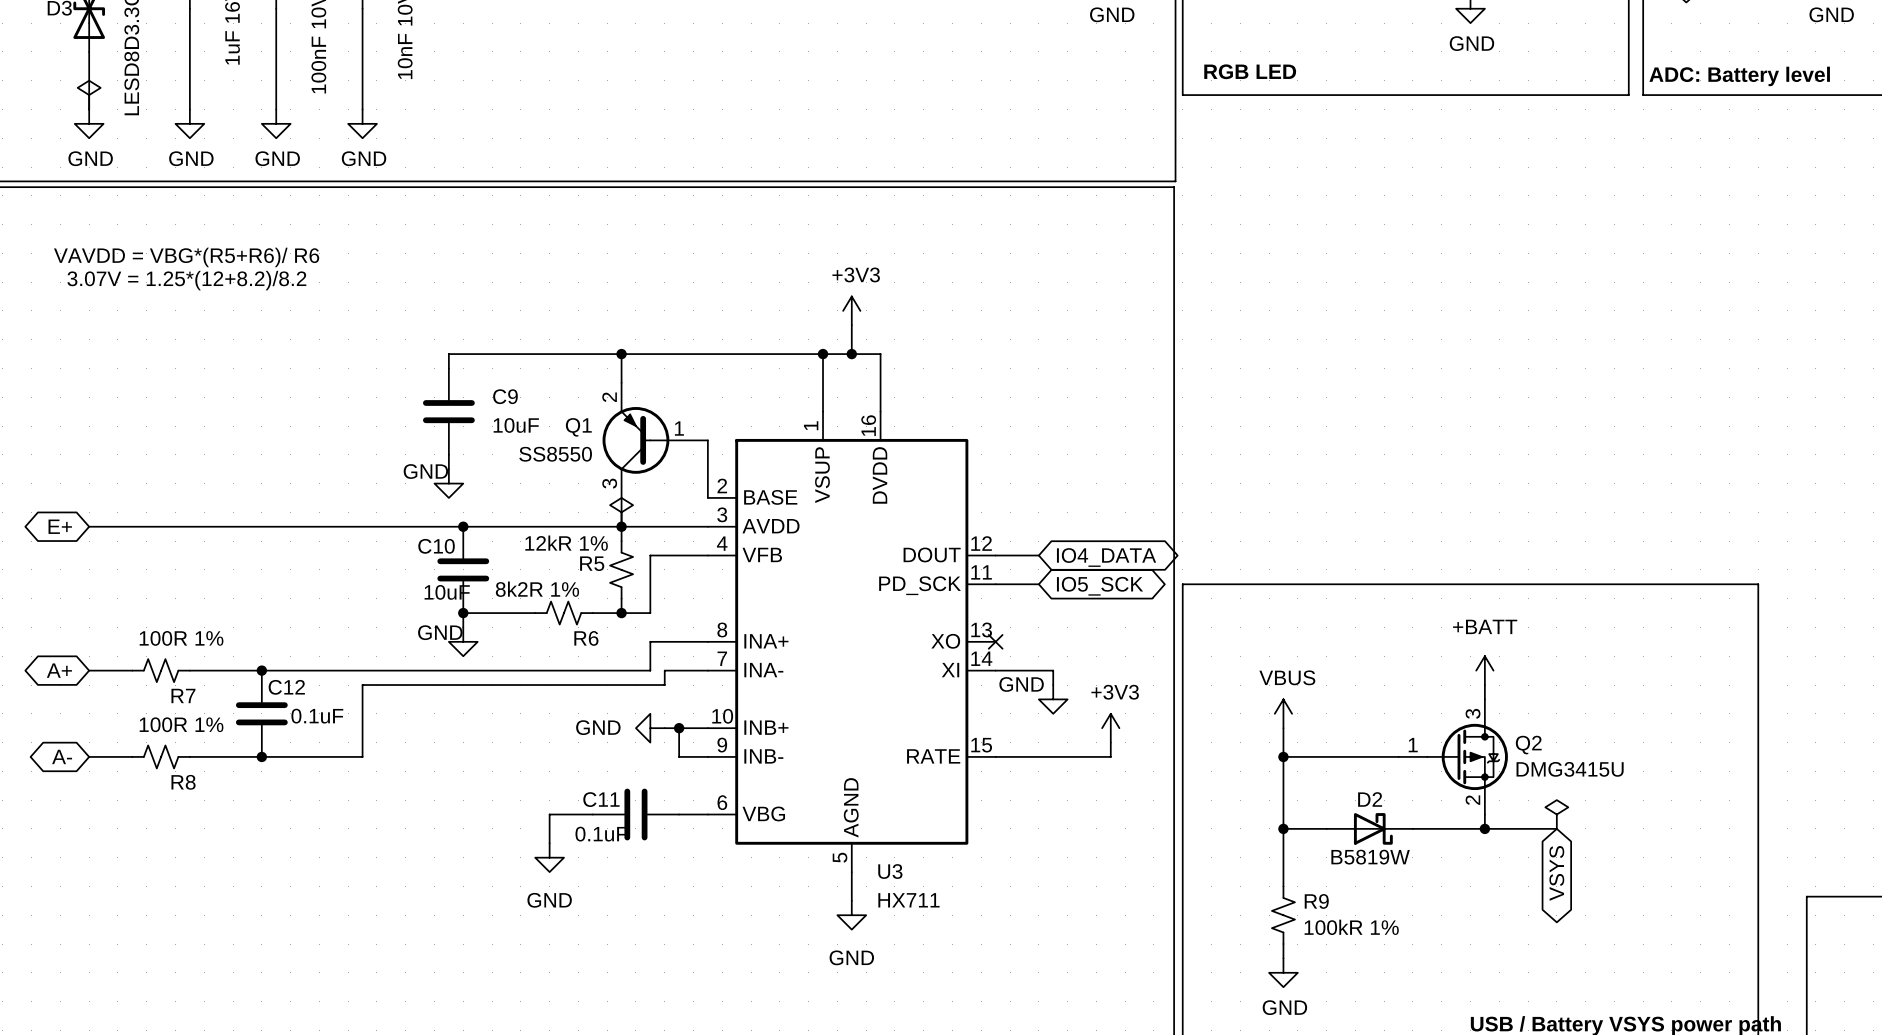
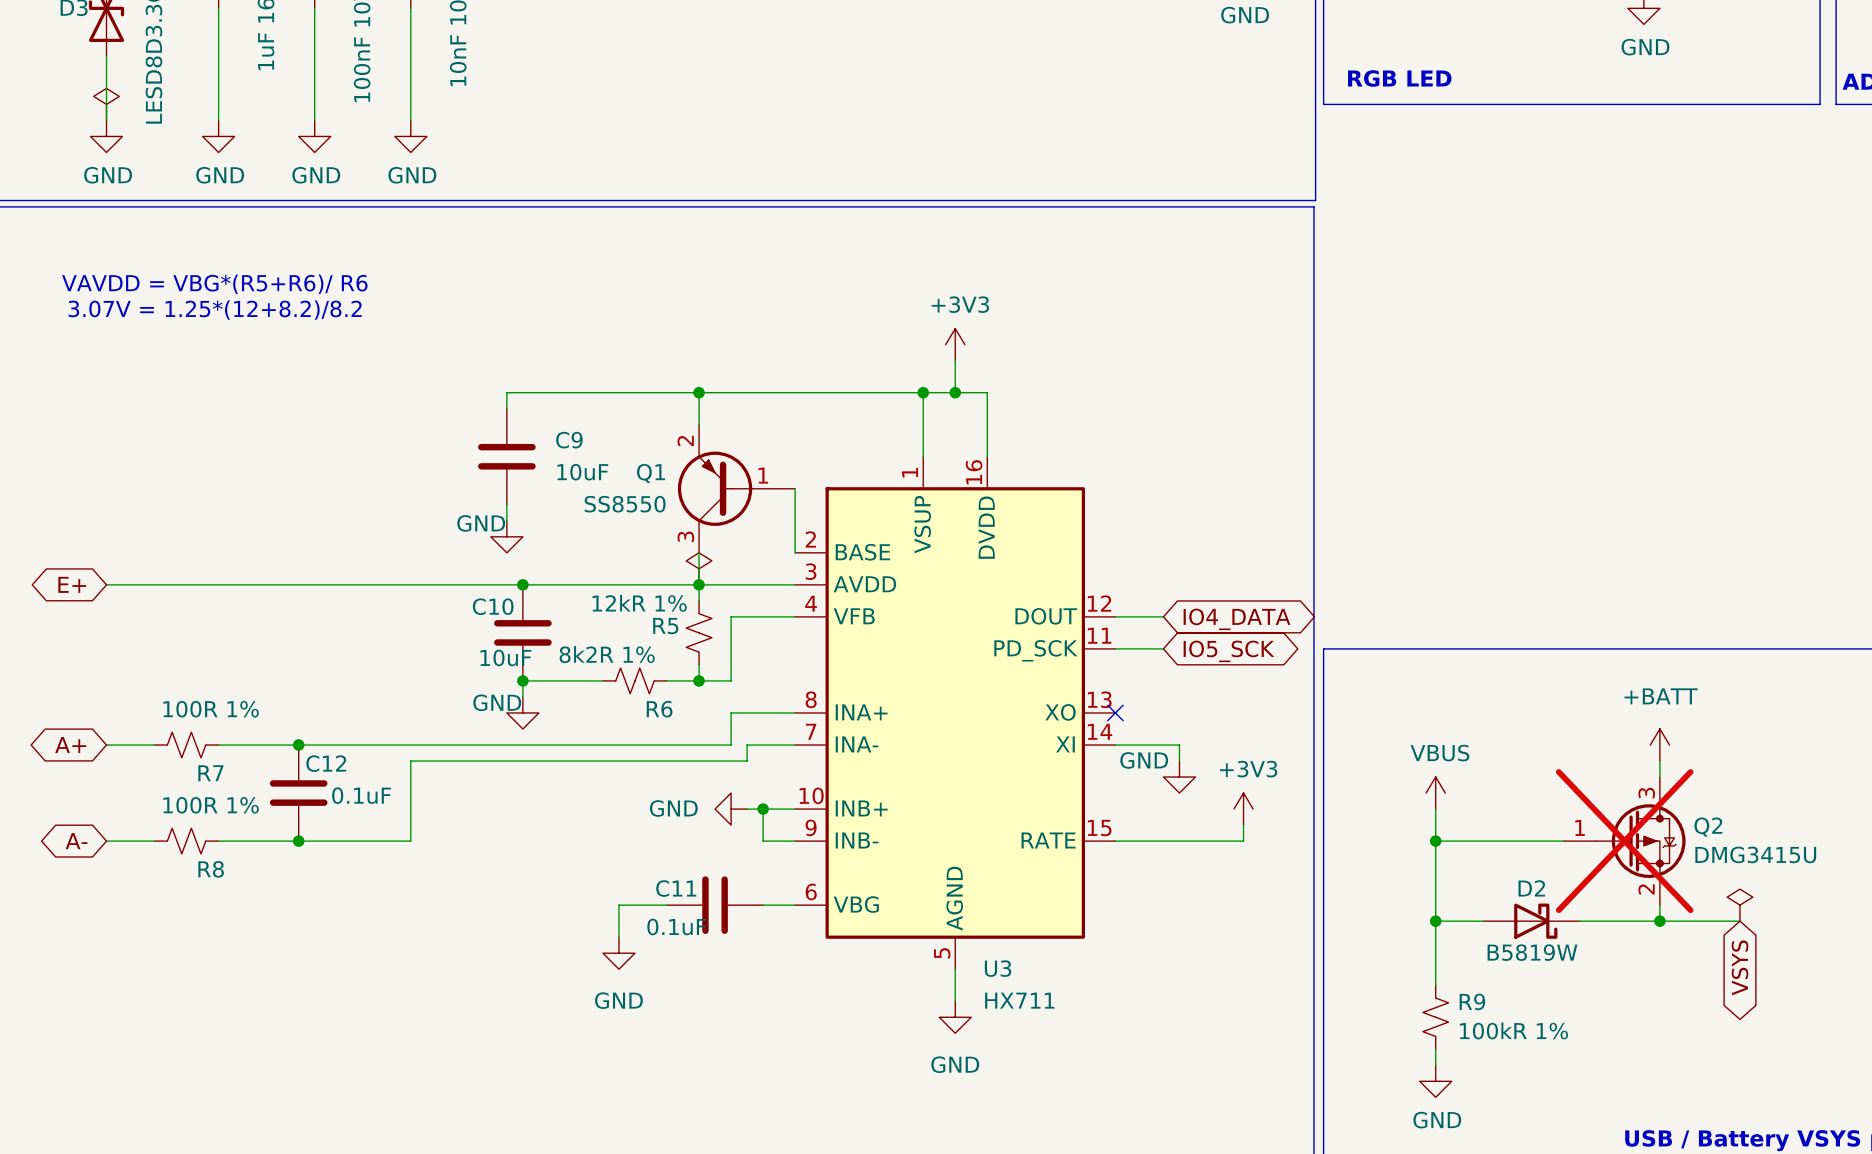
Q2 do-not-place cross: none -> (1624, 841)

